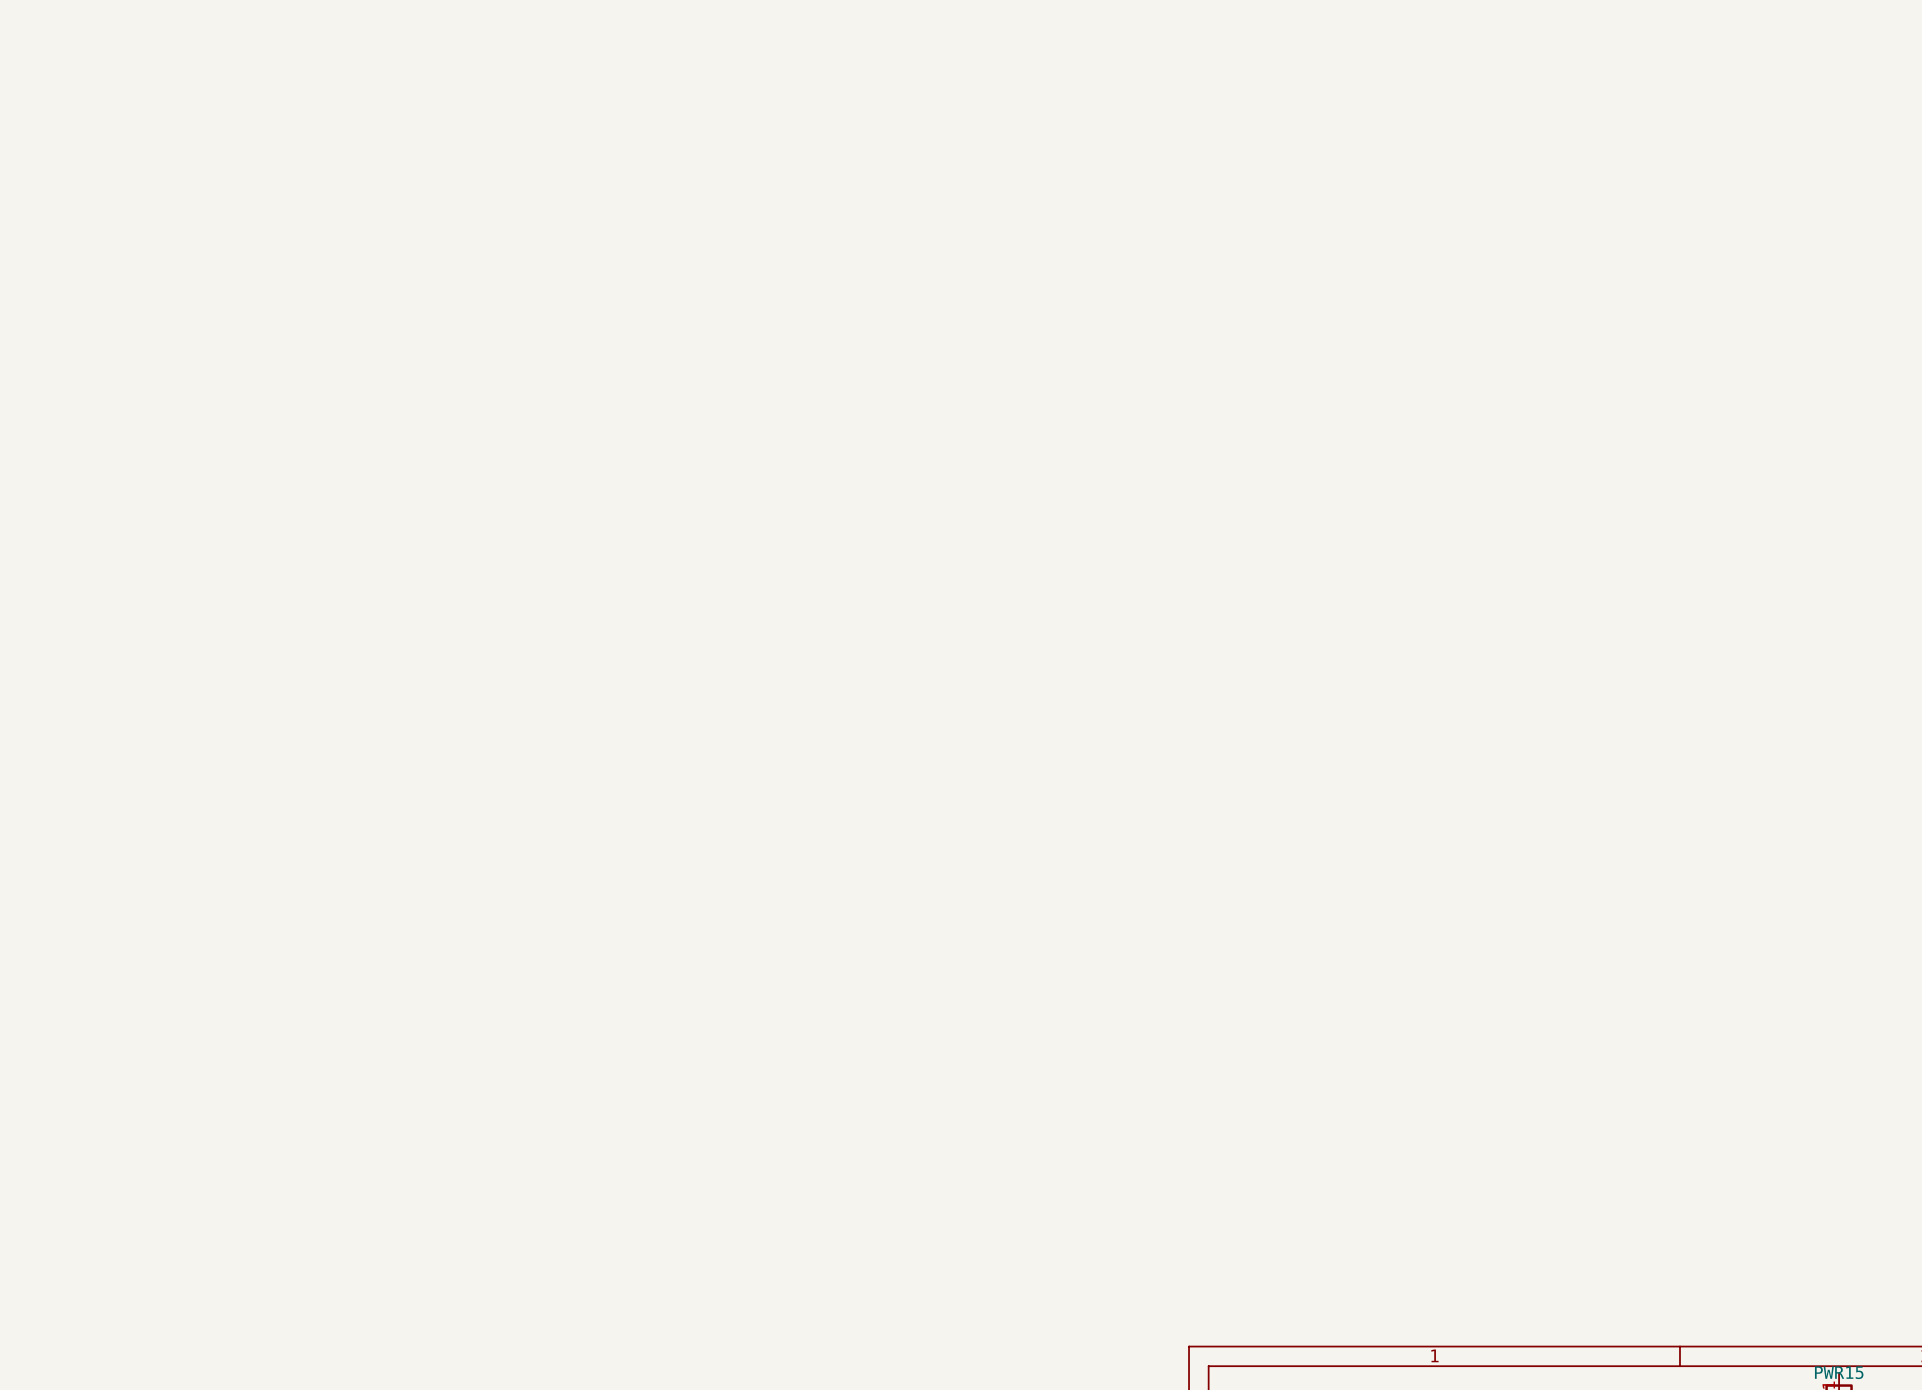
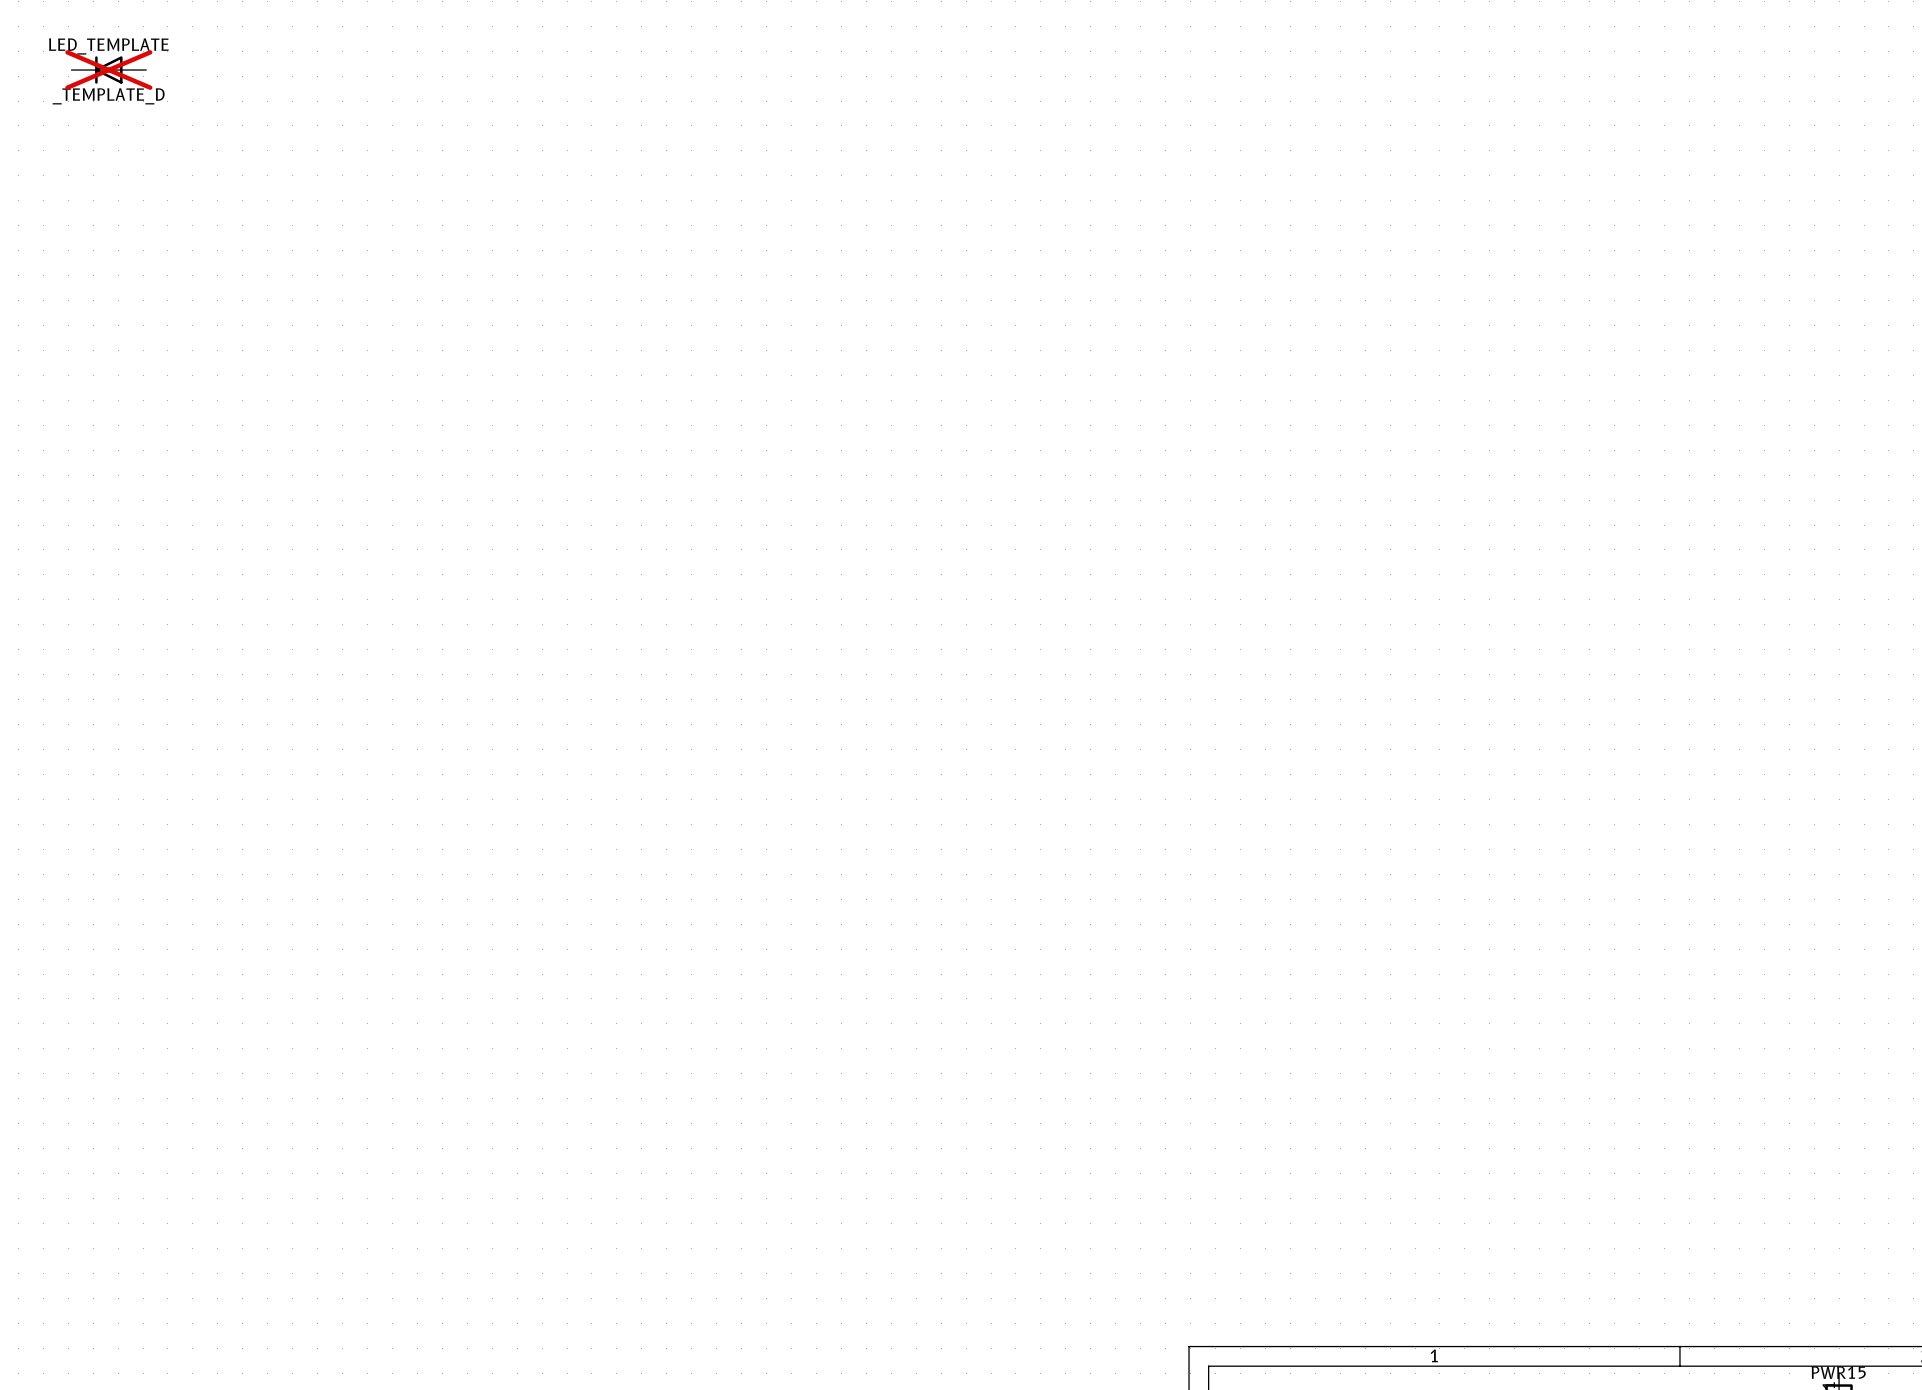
_TEMPLATE_D: none -> LED_TEMPLATE (108, 70)

